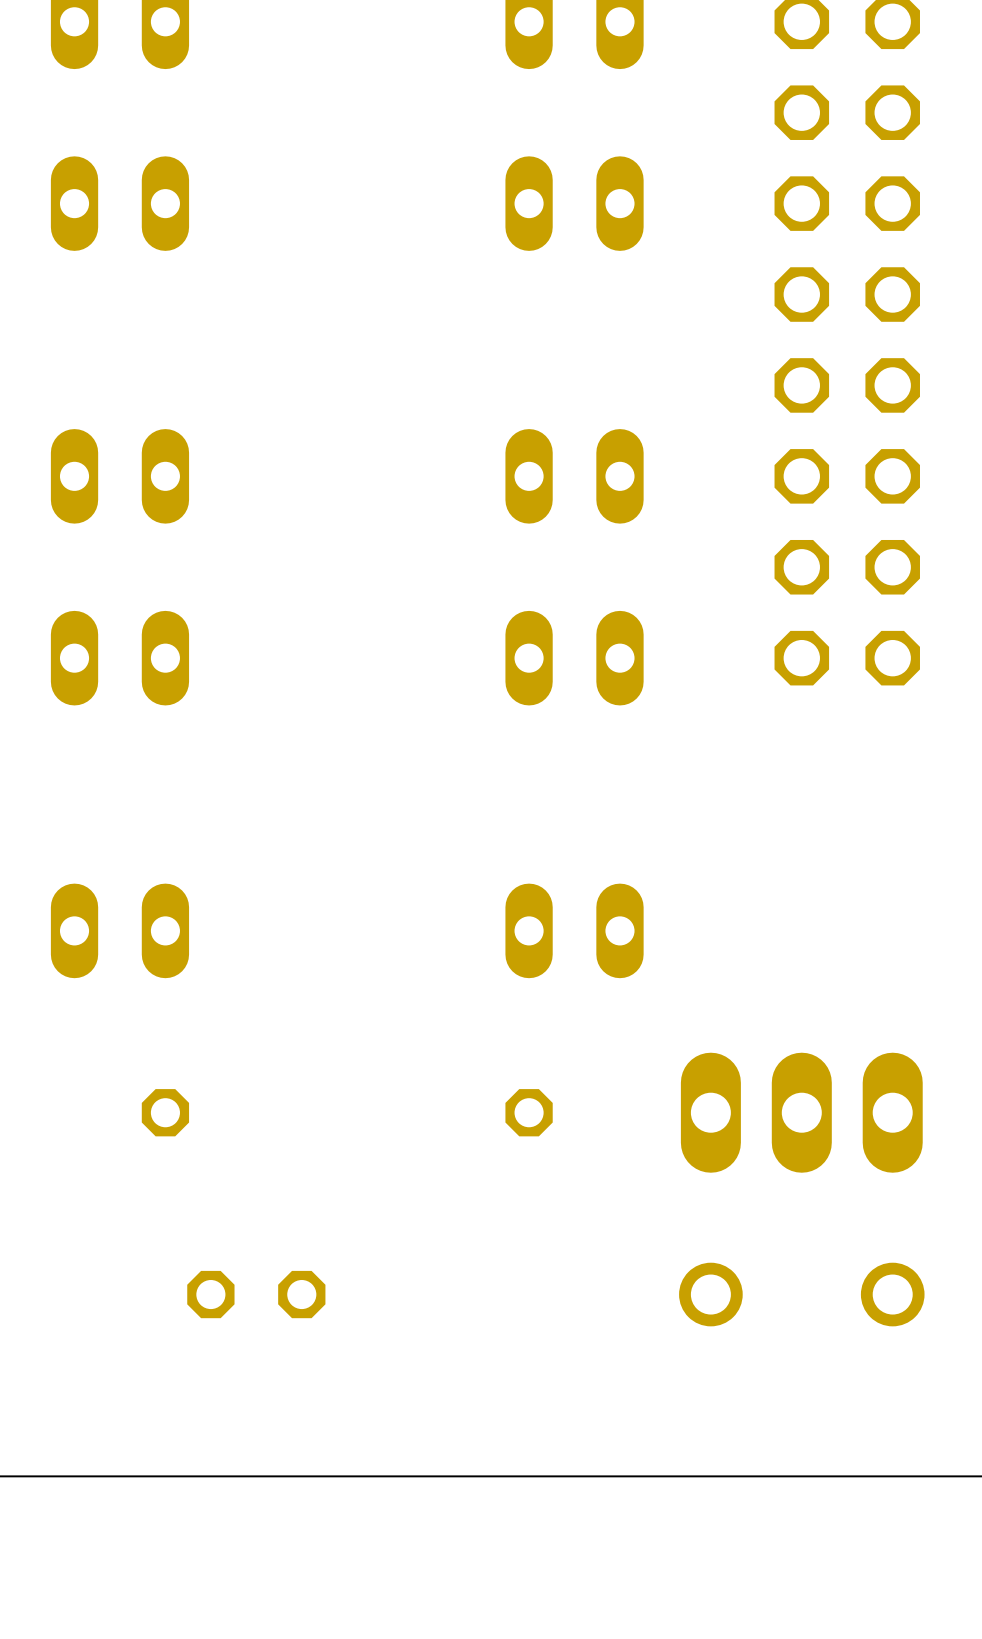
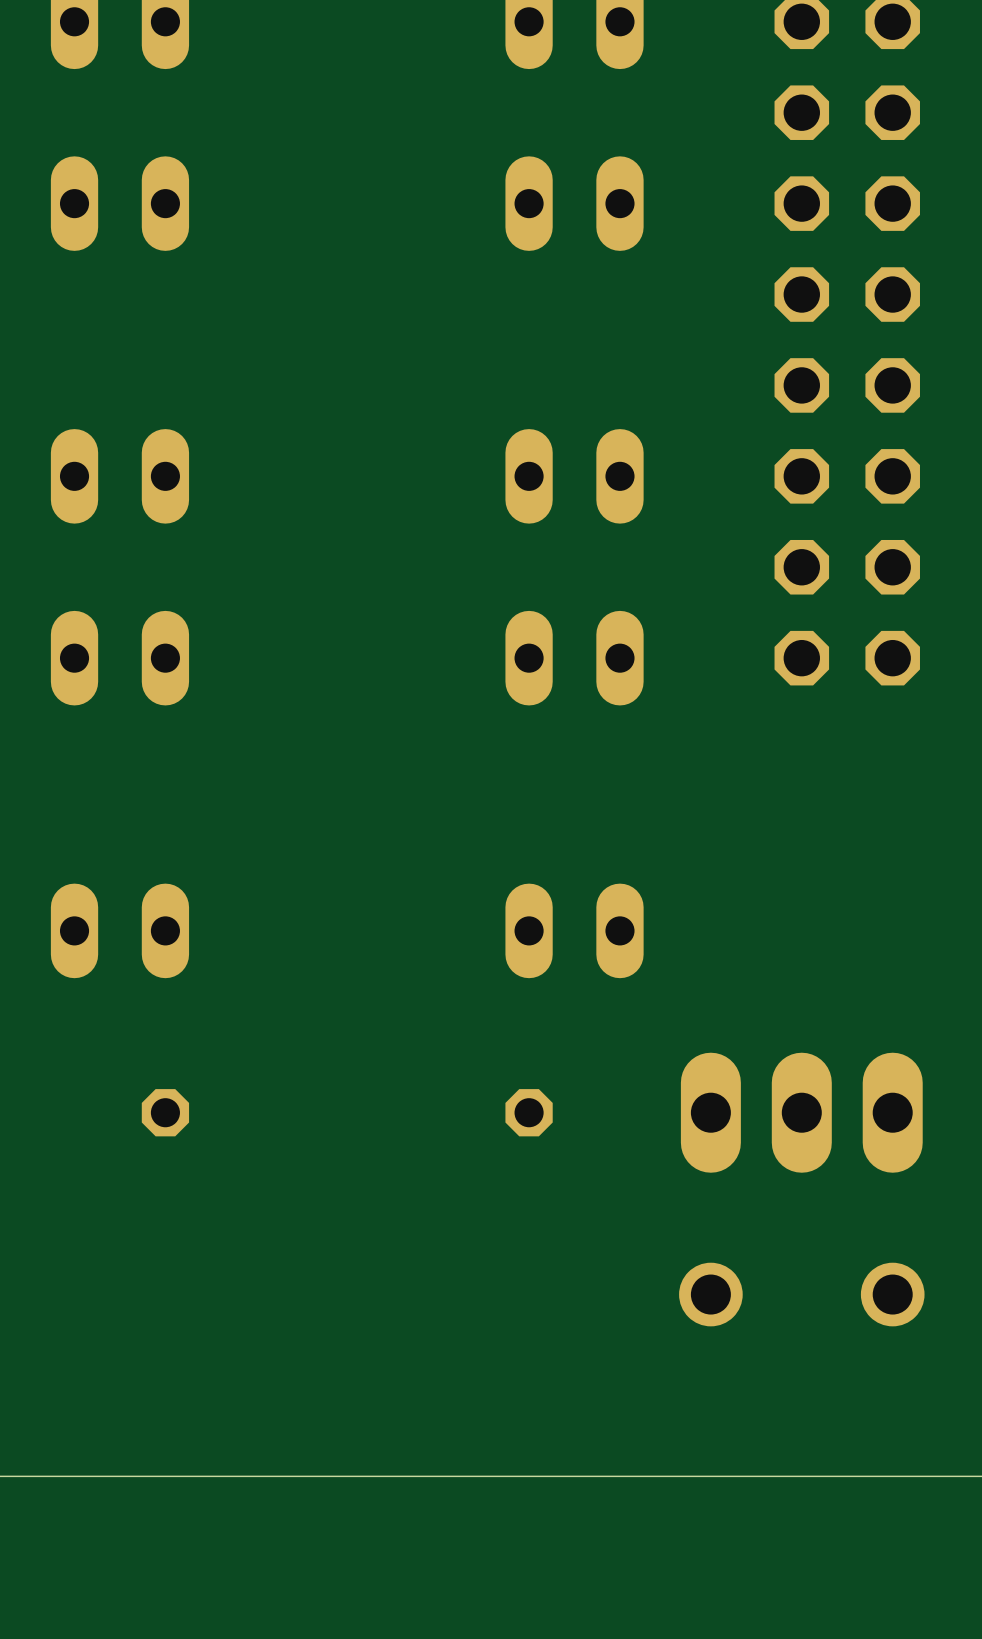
part: (256, 1294) -> none

